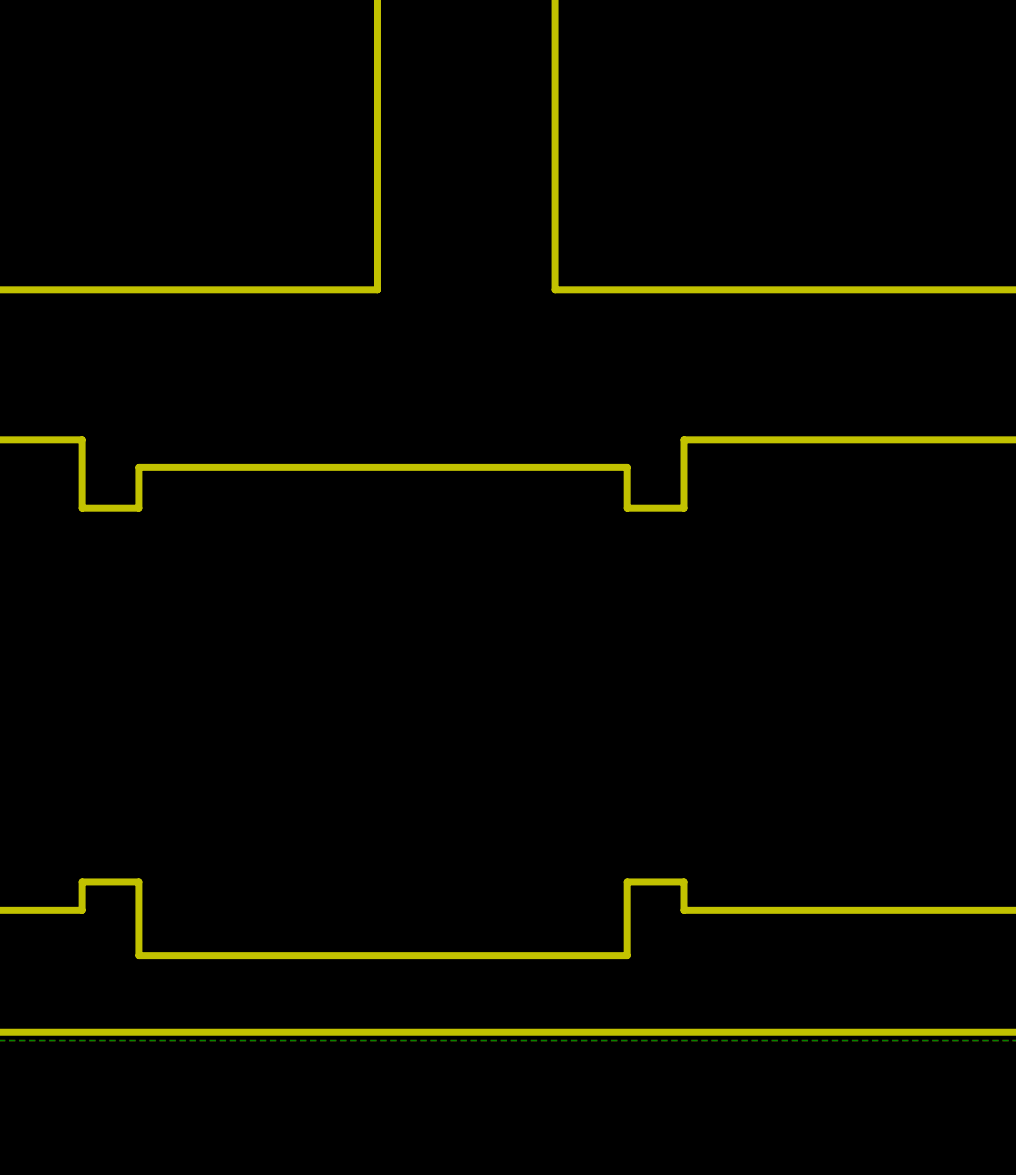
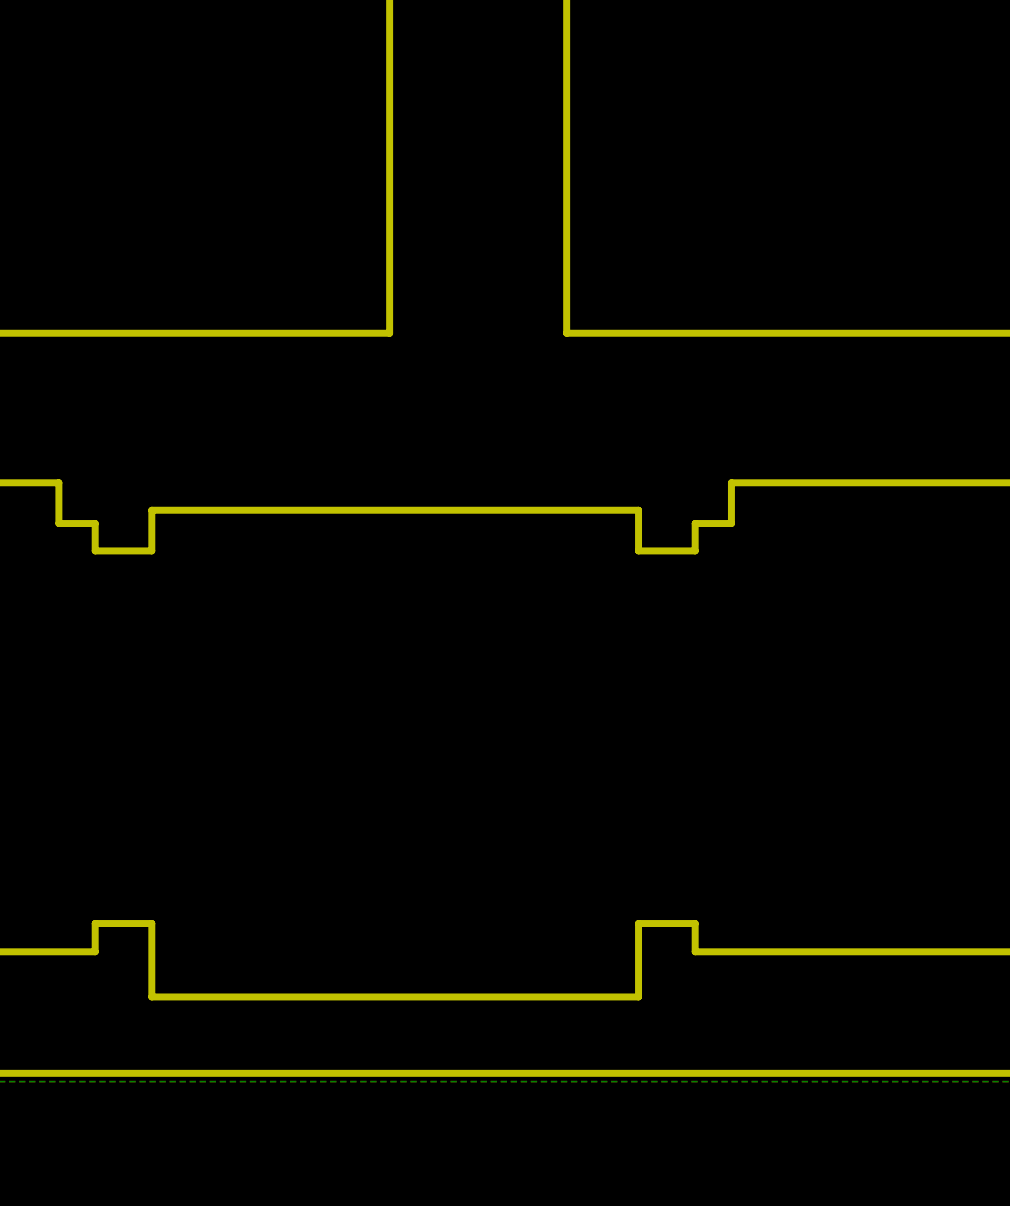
board edge: (45, 439) (82, 439) (82, 480) -> (58, 482) (58, 523) (95, 523)
board edge: (720, 439) (684, 439) (684, 480) -> (731, 482) (731, 523) (695, 523)

